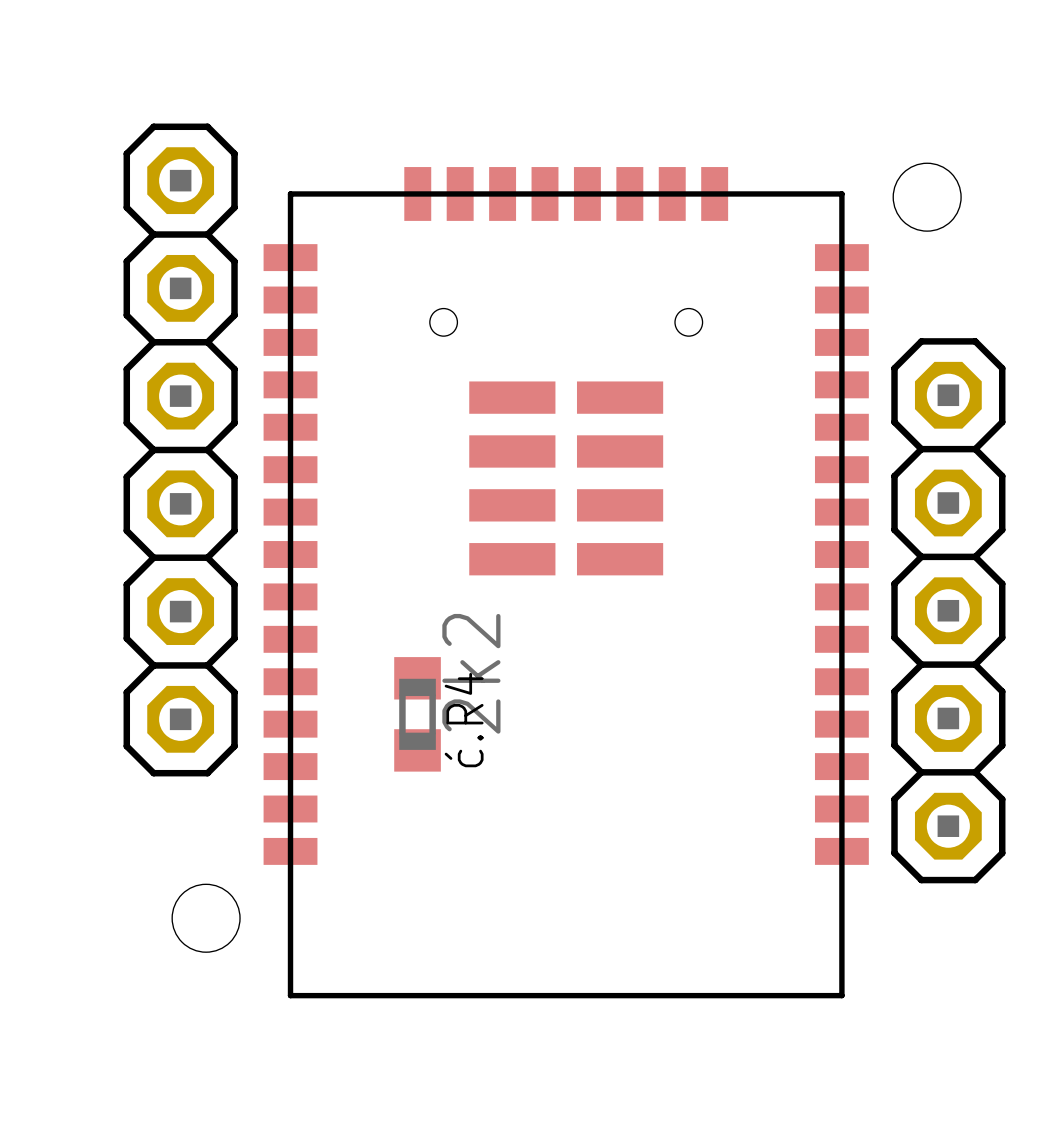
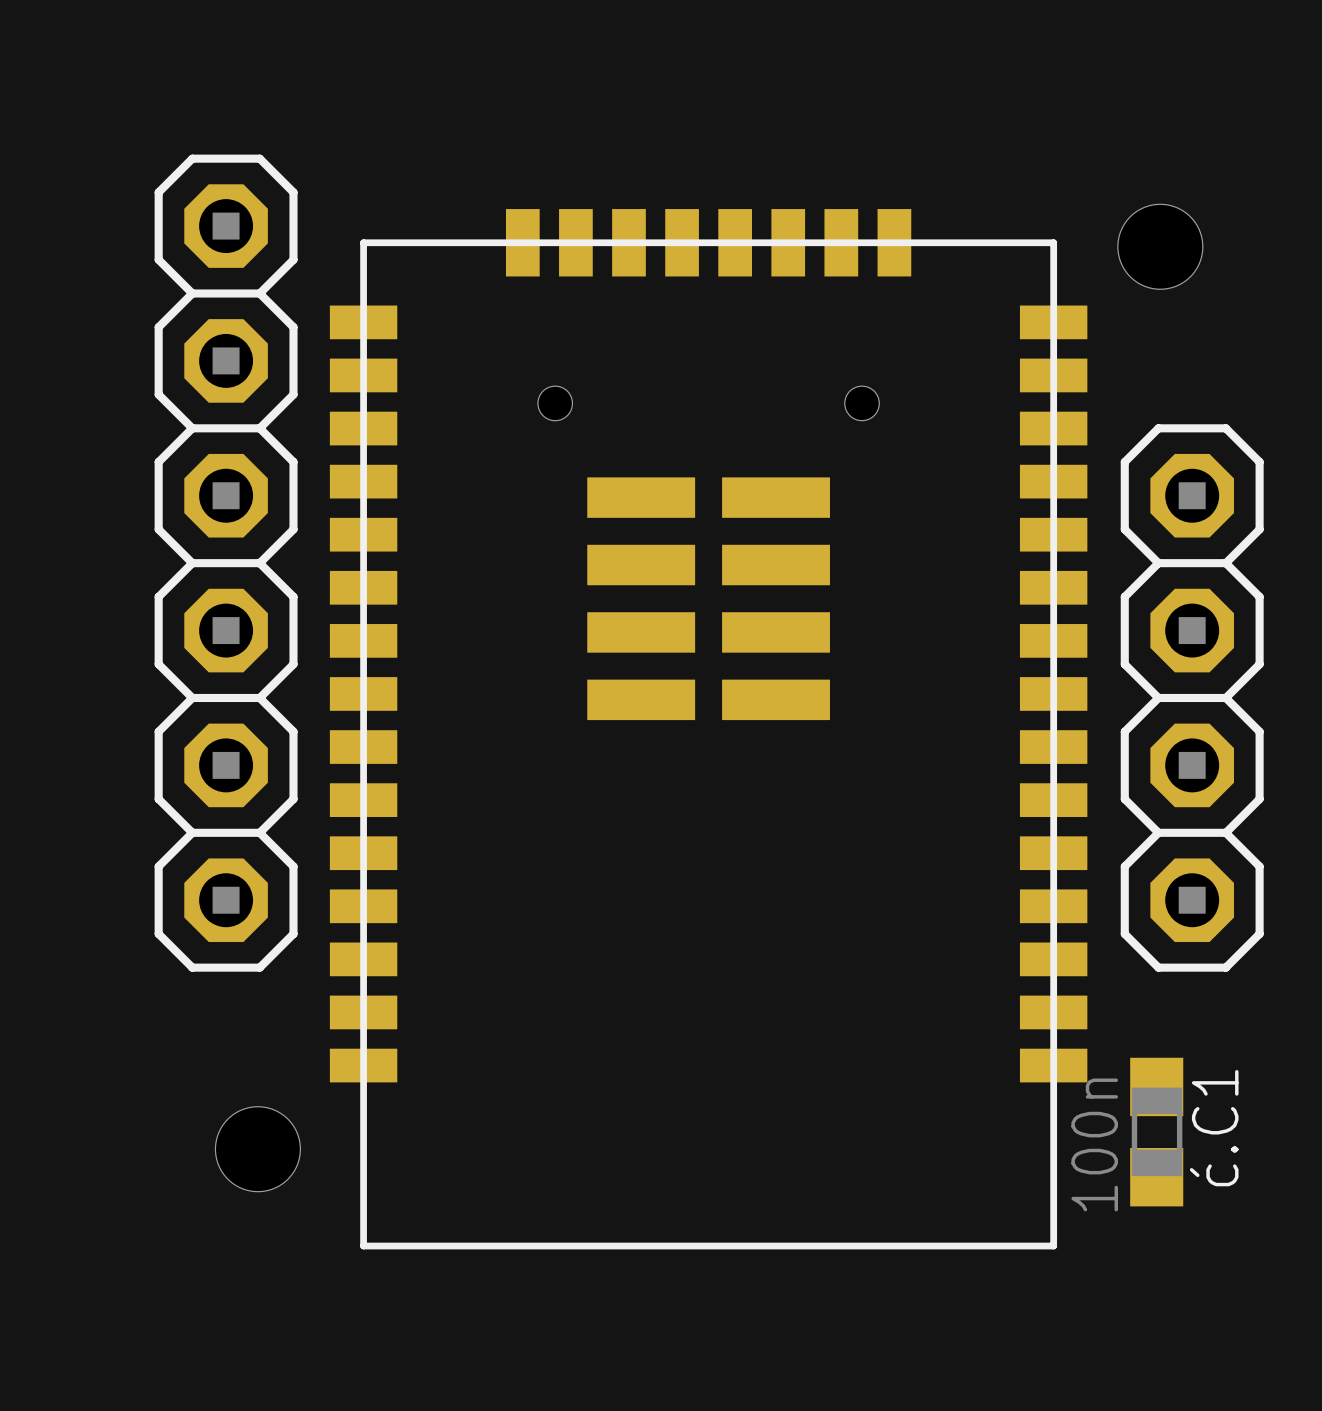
part: none -> (1192, 697)
part: (948, 610) -> none
ć.R4: 2k2 (417, 714) -> none
ć.C1: none -> 100n (1156, 1132)

